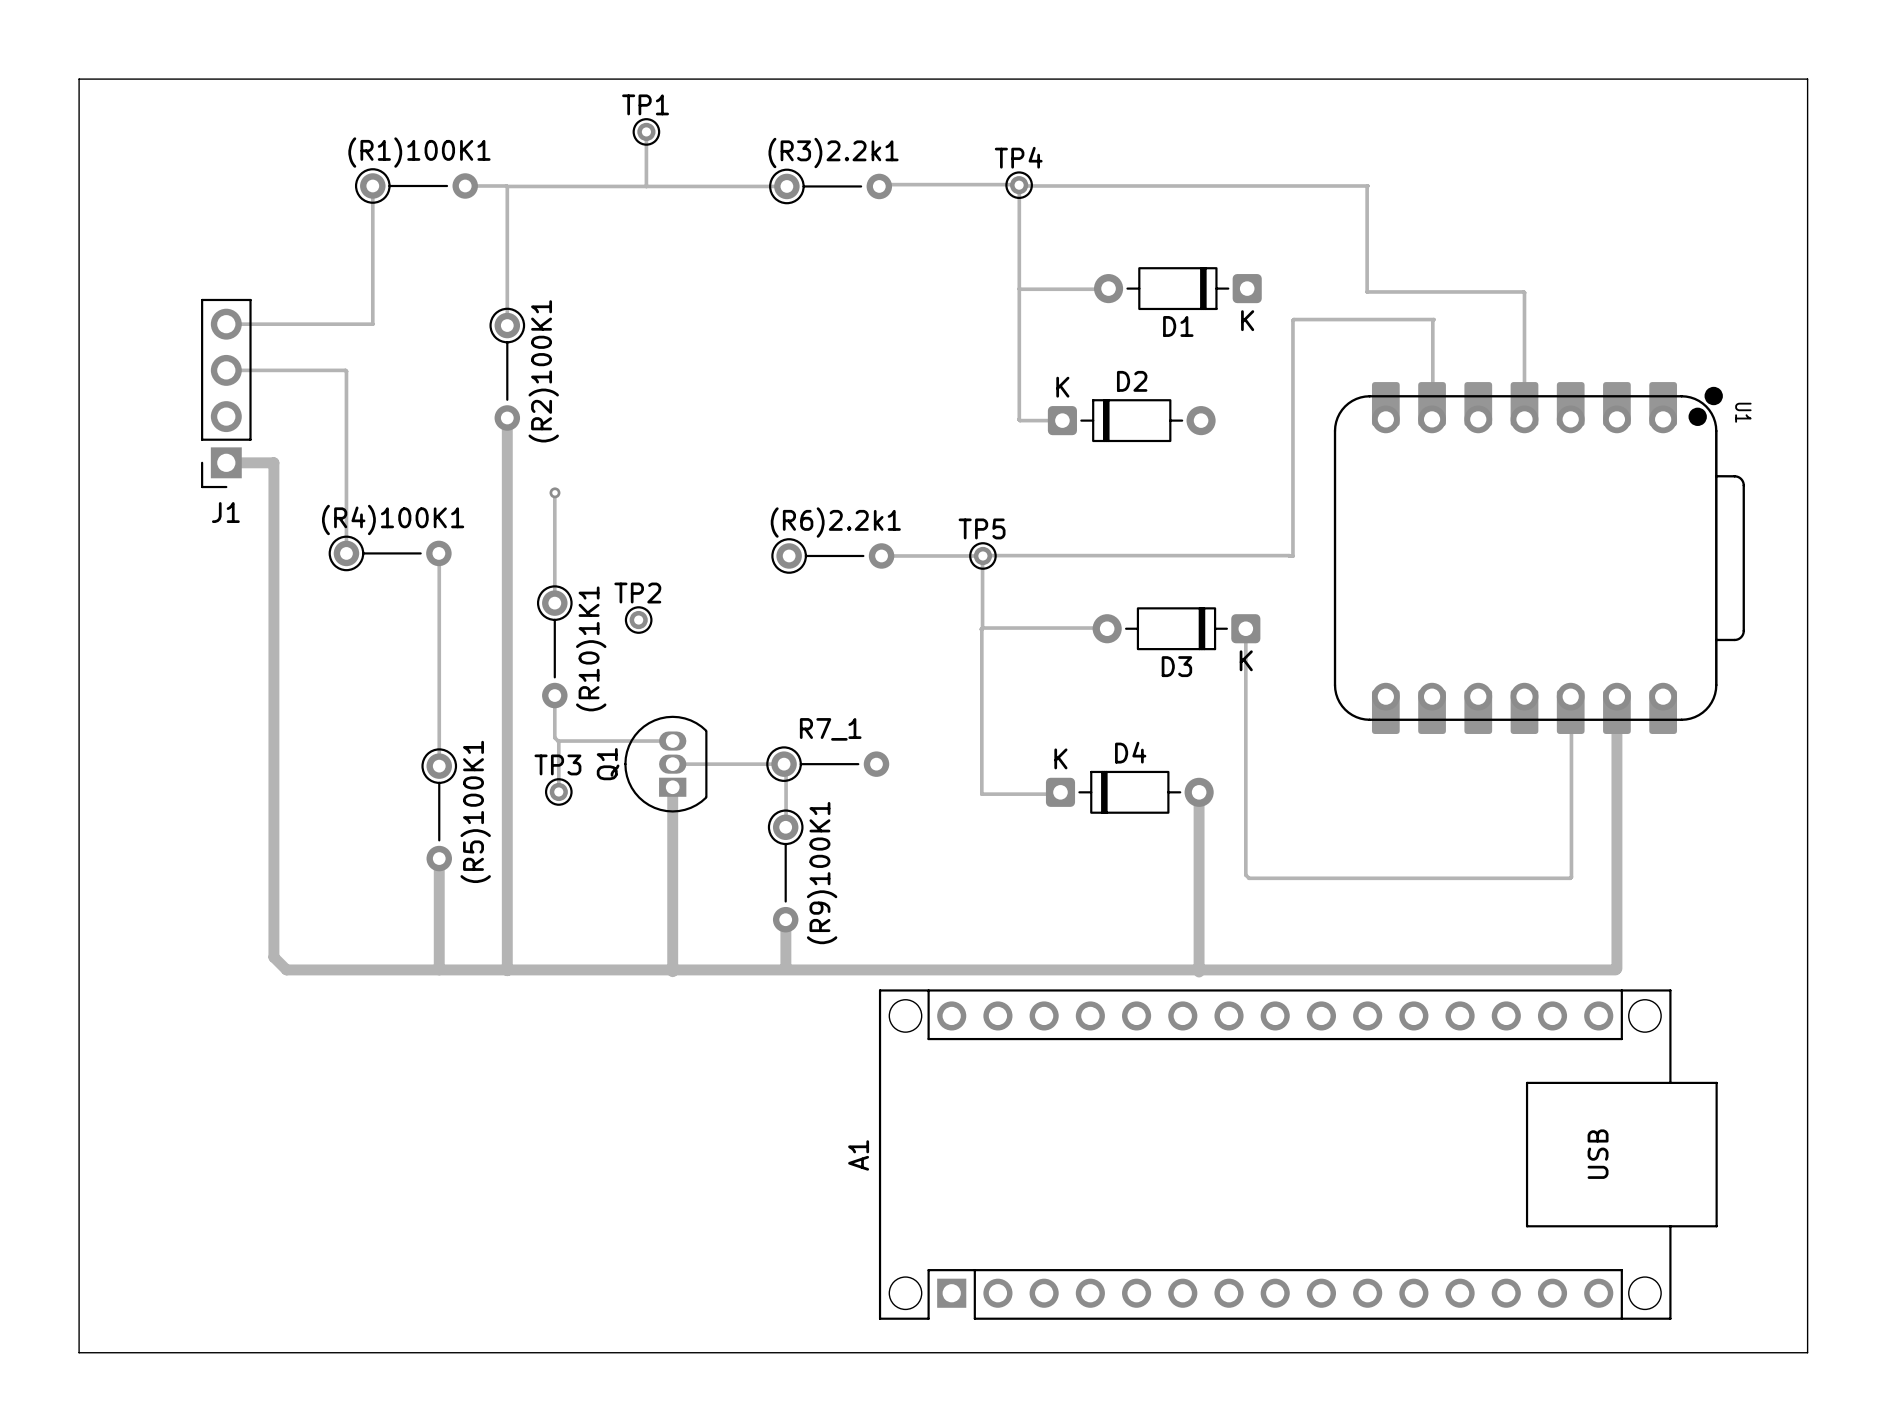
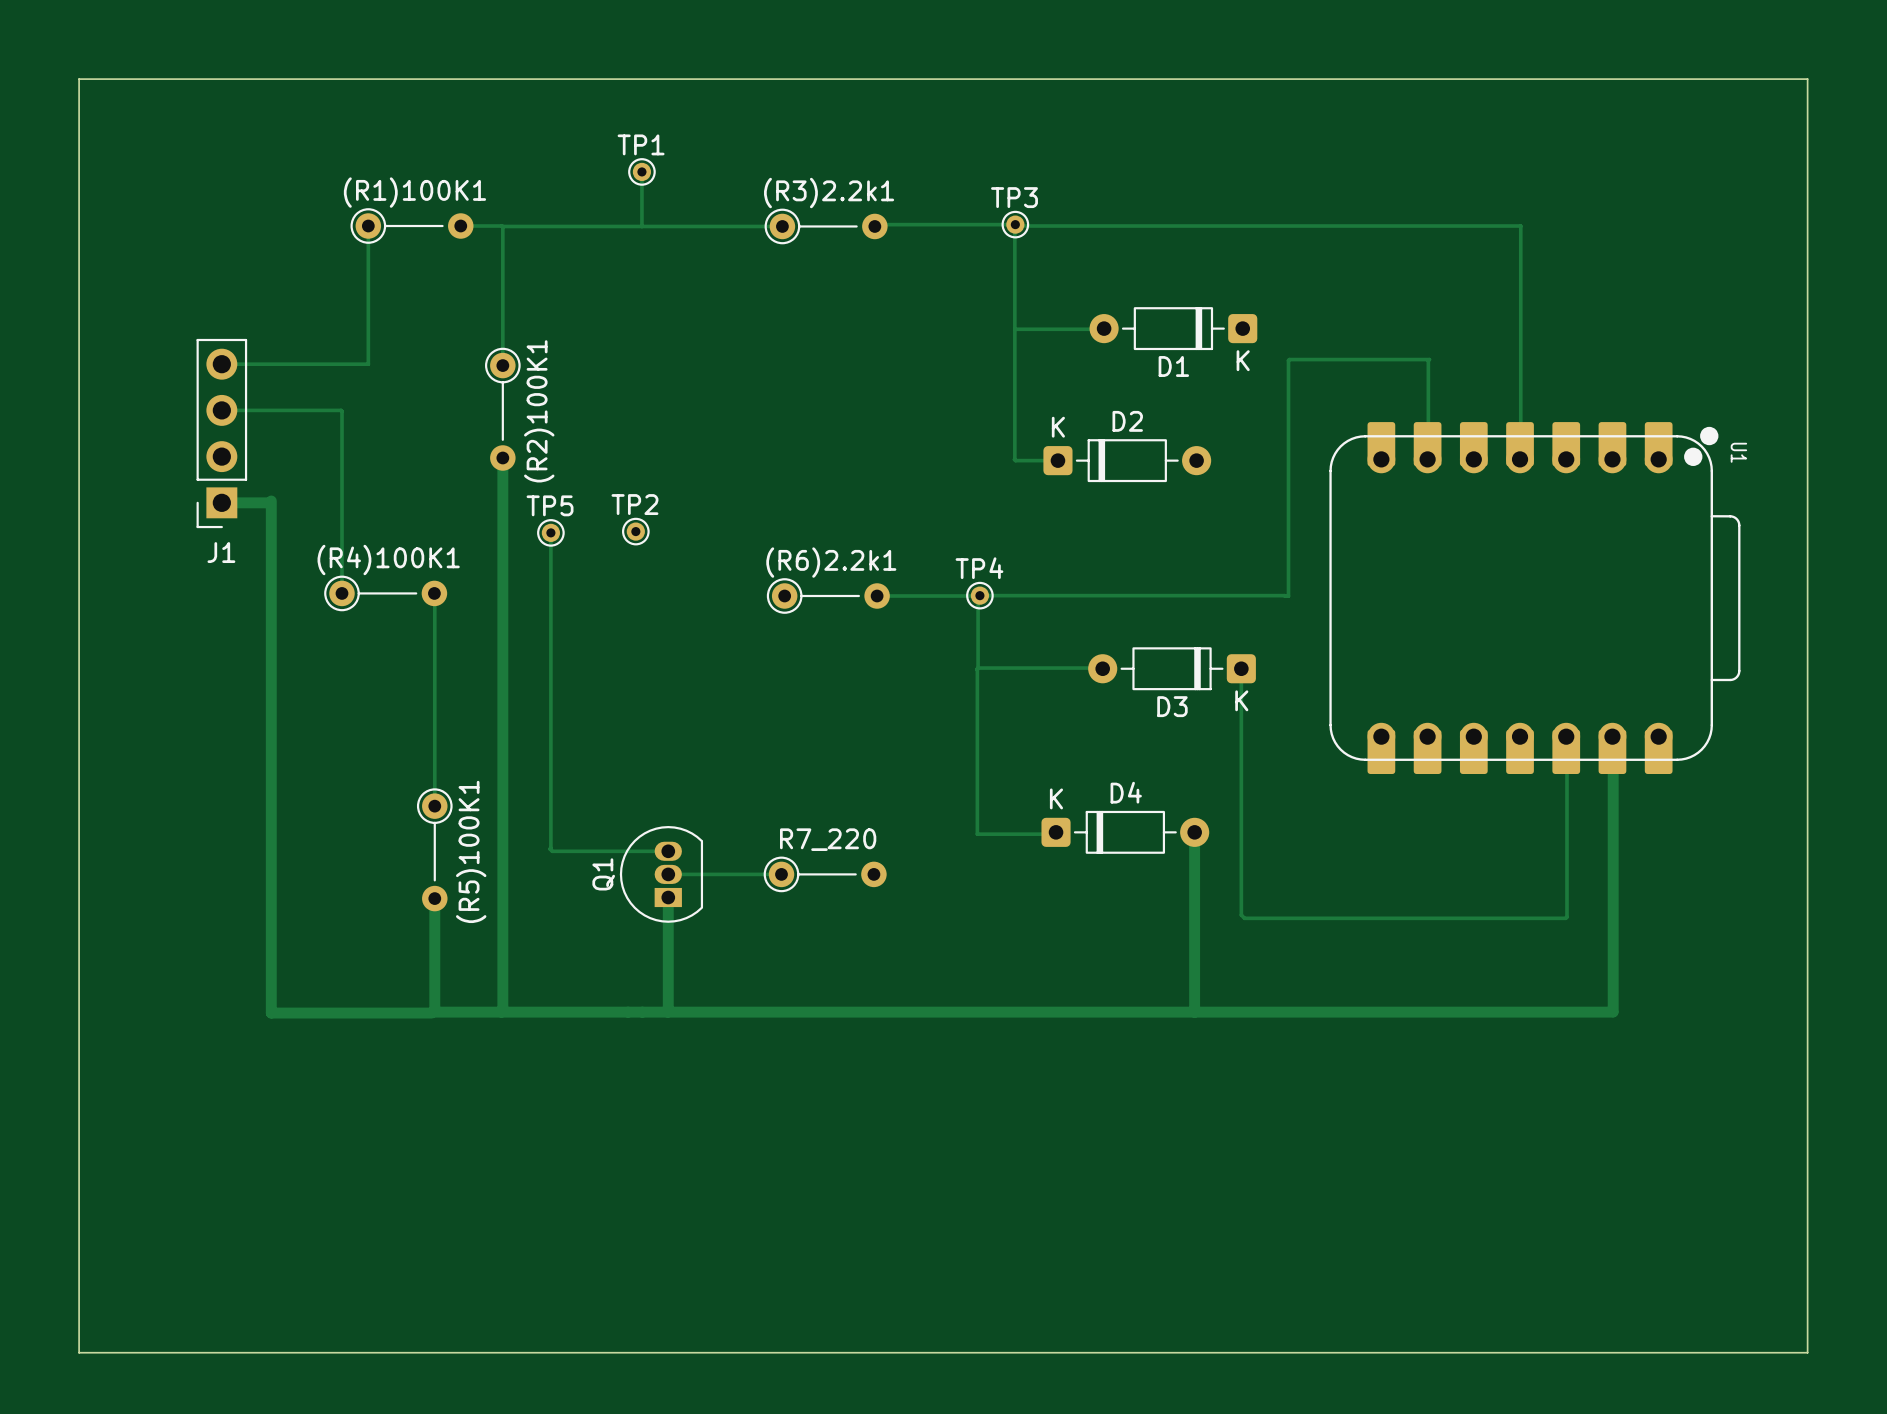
track: (646, 131) (646, 186) -> (641, 171) (641, 226)
TP1 position: (646, 131) -> (641, 171)
track: (878, 184) (1367, 185) (1367, 291) (1524, 292) (1524, 419) -> none
track: (372, 185) (372, 324) (226, 324) -> (368, 226) (368, 364) (221, 364)
(R1)100K1 position: (416, 185) -> (412, 226)
track: (465, 185) (507, 186) (507, 325) -> (460, 226) (502, 226) (502, 365)
track: (1019, 185) (1018, 419) (1062, 420) -> (1014, 225) (1014, 459) (1057, 460)
TP4 position: (1019, 185) -> (979, 595)
track: (506, 186) (786, 186) -> (502, 226) (782, 226)
(R3)2.2k1 position: (830, 186) -> (826, 226)
track: none -> (873, 224) (1520, 226) (1520, 441)
track: (1019, 288) (1114, 289) -> (1014, 328) (1110, 329)
D1 position: (1177, 288) -> (1173, 328)
(R2)100K1 position: (507, 369) -> (502, 409)
track: (226, 370) (346, 371) -> none
track: (346, 371) (346, 553) -> none
J1 position: (226, 393) -> (221, 433)
track: (1432, 401) (1433, 319) (1293, 319) (1292, 556) (984, 555) -> (1428, 441) (1429, 359) (1289, 359) (1288, 596) (979, 595)
track: none -> (221, 410) (342, 411) (341, 593)
track: (507, 417) (505, 972) -> (502, 457) (501, 1012)
D2 position: (1131, 420) -> (1127, 460)
track: (226, 462) (273, 462) (273, 957) (286, 969) (1615, 969) -> none
via: (554, 492) -> none
track: (554, 493) (554, 603) -> none
track: none -> (271, 500) (271, 1013) (431, 1013) (434, 1009) (434, 898)
track: none -> (221, 502) (269, 502)
track: none -> (550, 532) (549, 848) (552, 851) (668, 851)
(R4)100K1 position: (390, 553) -> (385, 593)
track: (438, 553) (439, 766) -> (434, 593) (434, 806)
(R6)2.2k1 position: (832, 555) -> (828, 595)
track: (881, 555) (982, 555) (982, 628) -> (877, 595) (978, 595) (978, 668)
TP5 position: (982, 555) -> (550, 532)
U1 position: (1539, 558) -> (1534, 598)
TP2 position: (638, 620) -> (635, 531)
track: (982, 628) (1114, 628) -> (978, 668) (1110, 668)
track: (982, 628) (981, 794) (1060, 794) -> (978, 668) (977, 834) (1055, 834)
D3 position: (1176, 628) -> (1172, 668)
track: (1245, 628) (1245, 875) (1249, 878) (1570, 878) (1571, 695) -> (1241, 668) (1241, 915) (1244, 918) (1565, 918) (1566, 735)
(R10)1K1: (554, 646) -> none
track: (554, 695) (554, 737) (558, 741) (558, 791) -> none
track: (1616, 696) (1616, 968) -> none
track: none -> (1613, 735) (1612, 1012) (432, 1012)
track: (558, 741) (672, 741) -> none
Q1 position: (665, 764) -> (661, 874)
track: (672, 764) (784, 764) (786, 762) (786, 820) -> none
R7_1: (827, 764) -> none
track: (672, 787) (672, 972) -> none
TP3 position: (558, 791) -> (1015, 224)
D4 position: (1129, 792) -> (1125, 832)
track: (1199, 794) (1199, 972) -> (1194, 834) (1194, 1012)
(R5)100K1 position: (439, 809) -> (434, 849)
track: (439, 858) (439, 969) (436, 973) -> none
(R9)100K1: (785, 870) -> none
track: none -> (668, 874) (781, 874)
R7_220: none -> (825, 874)
track: none -> (668, 897) (667, 1012)
track: (785, 912) (785, 969) -> none
A1: (1298, 1154) -> none

